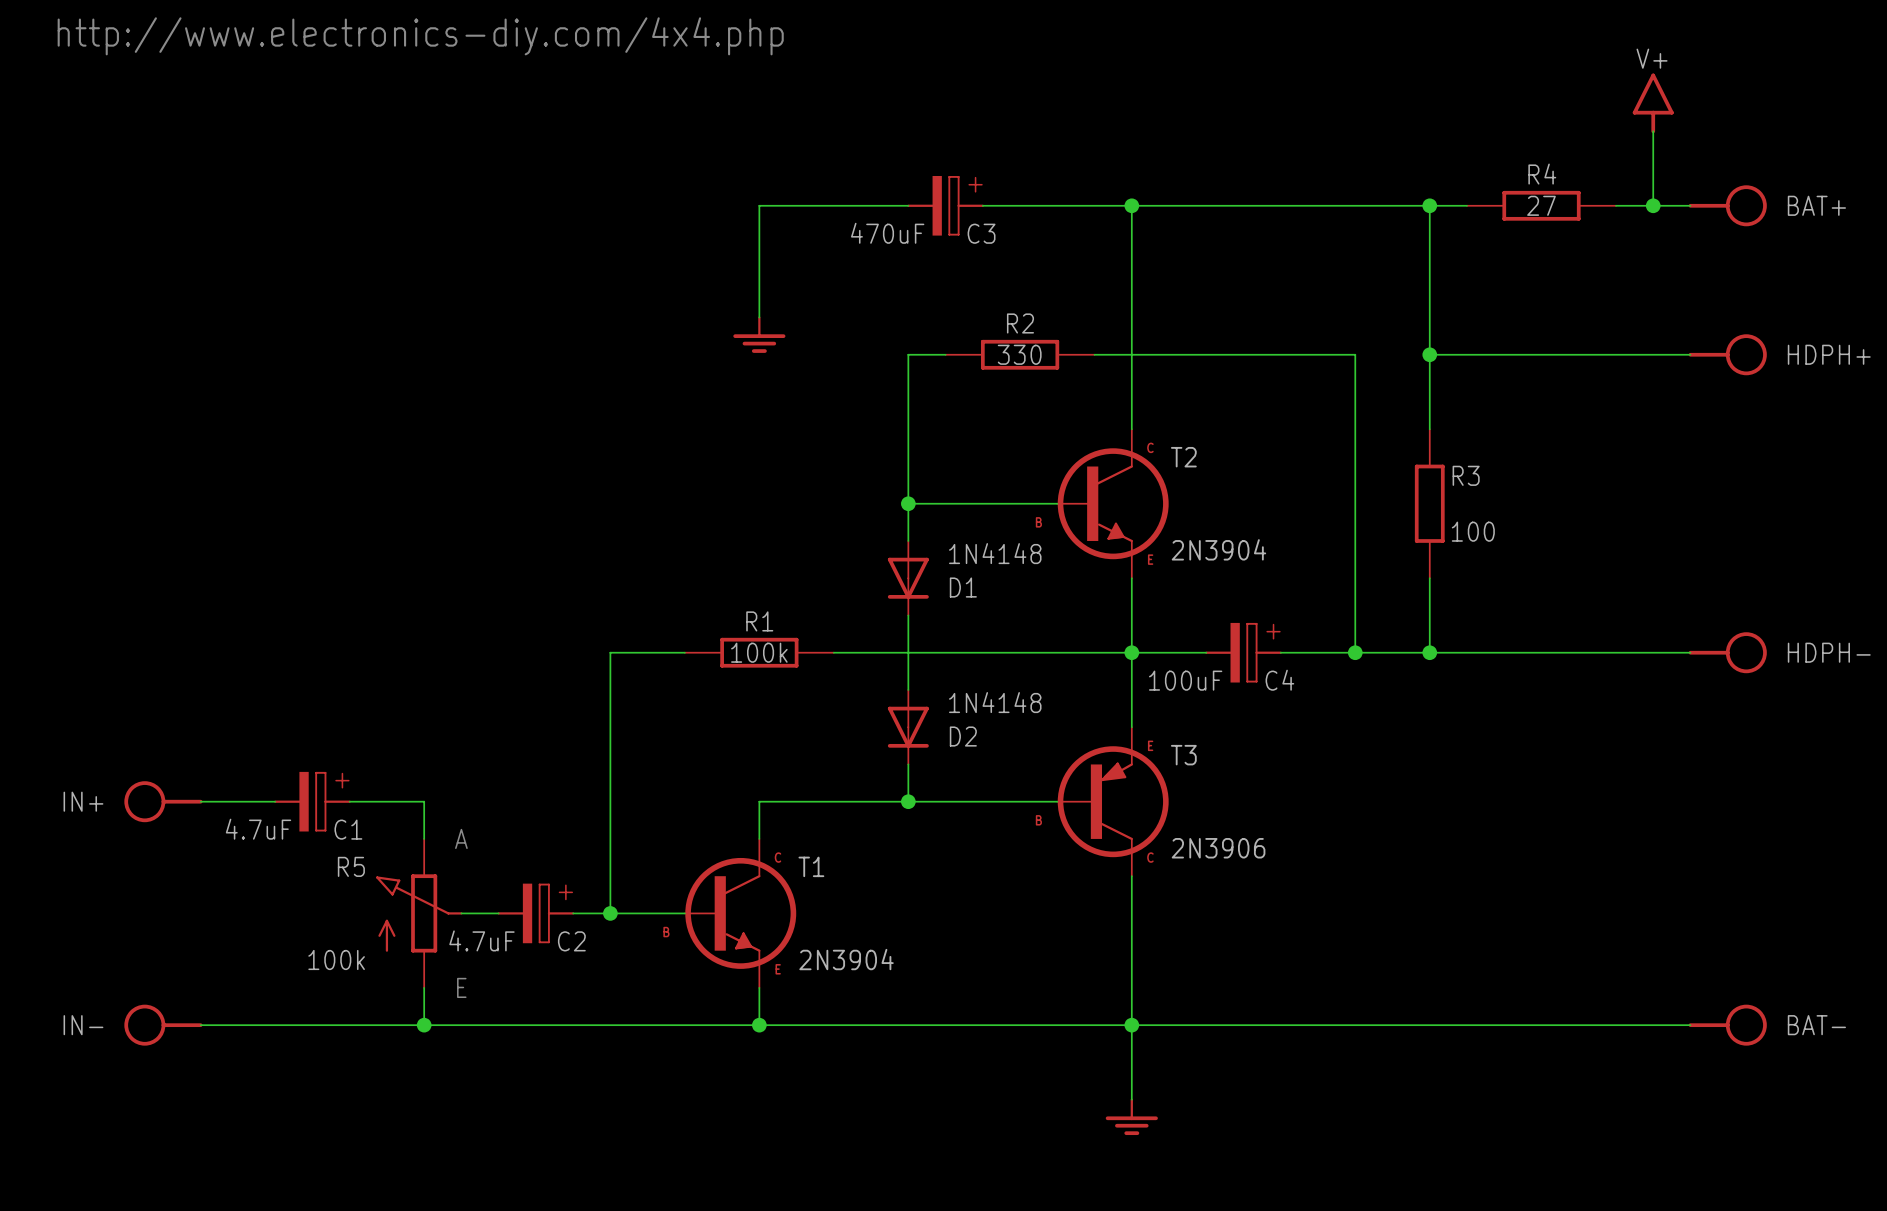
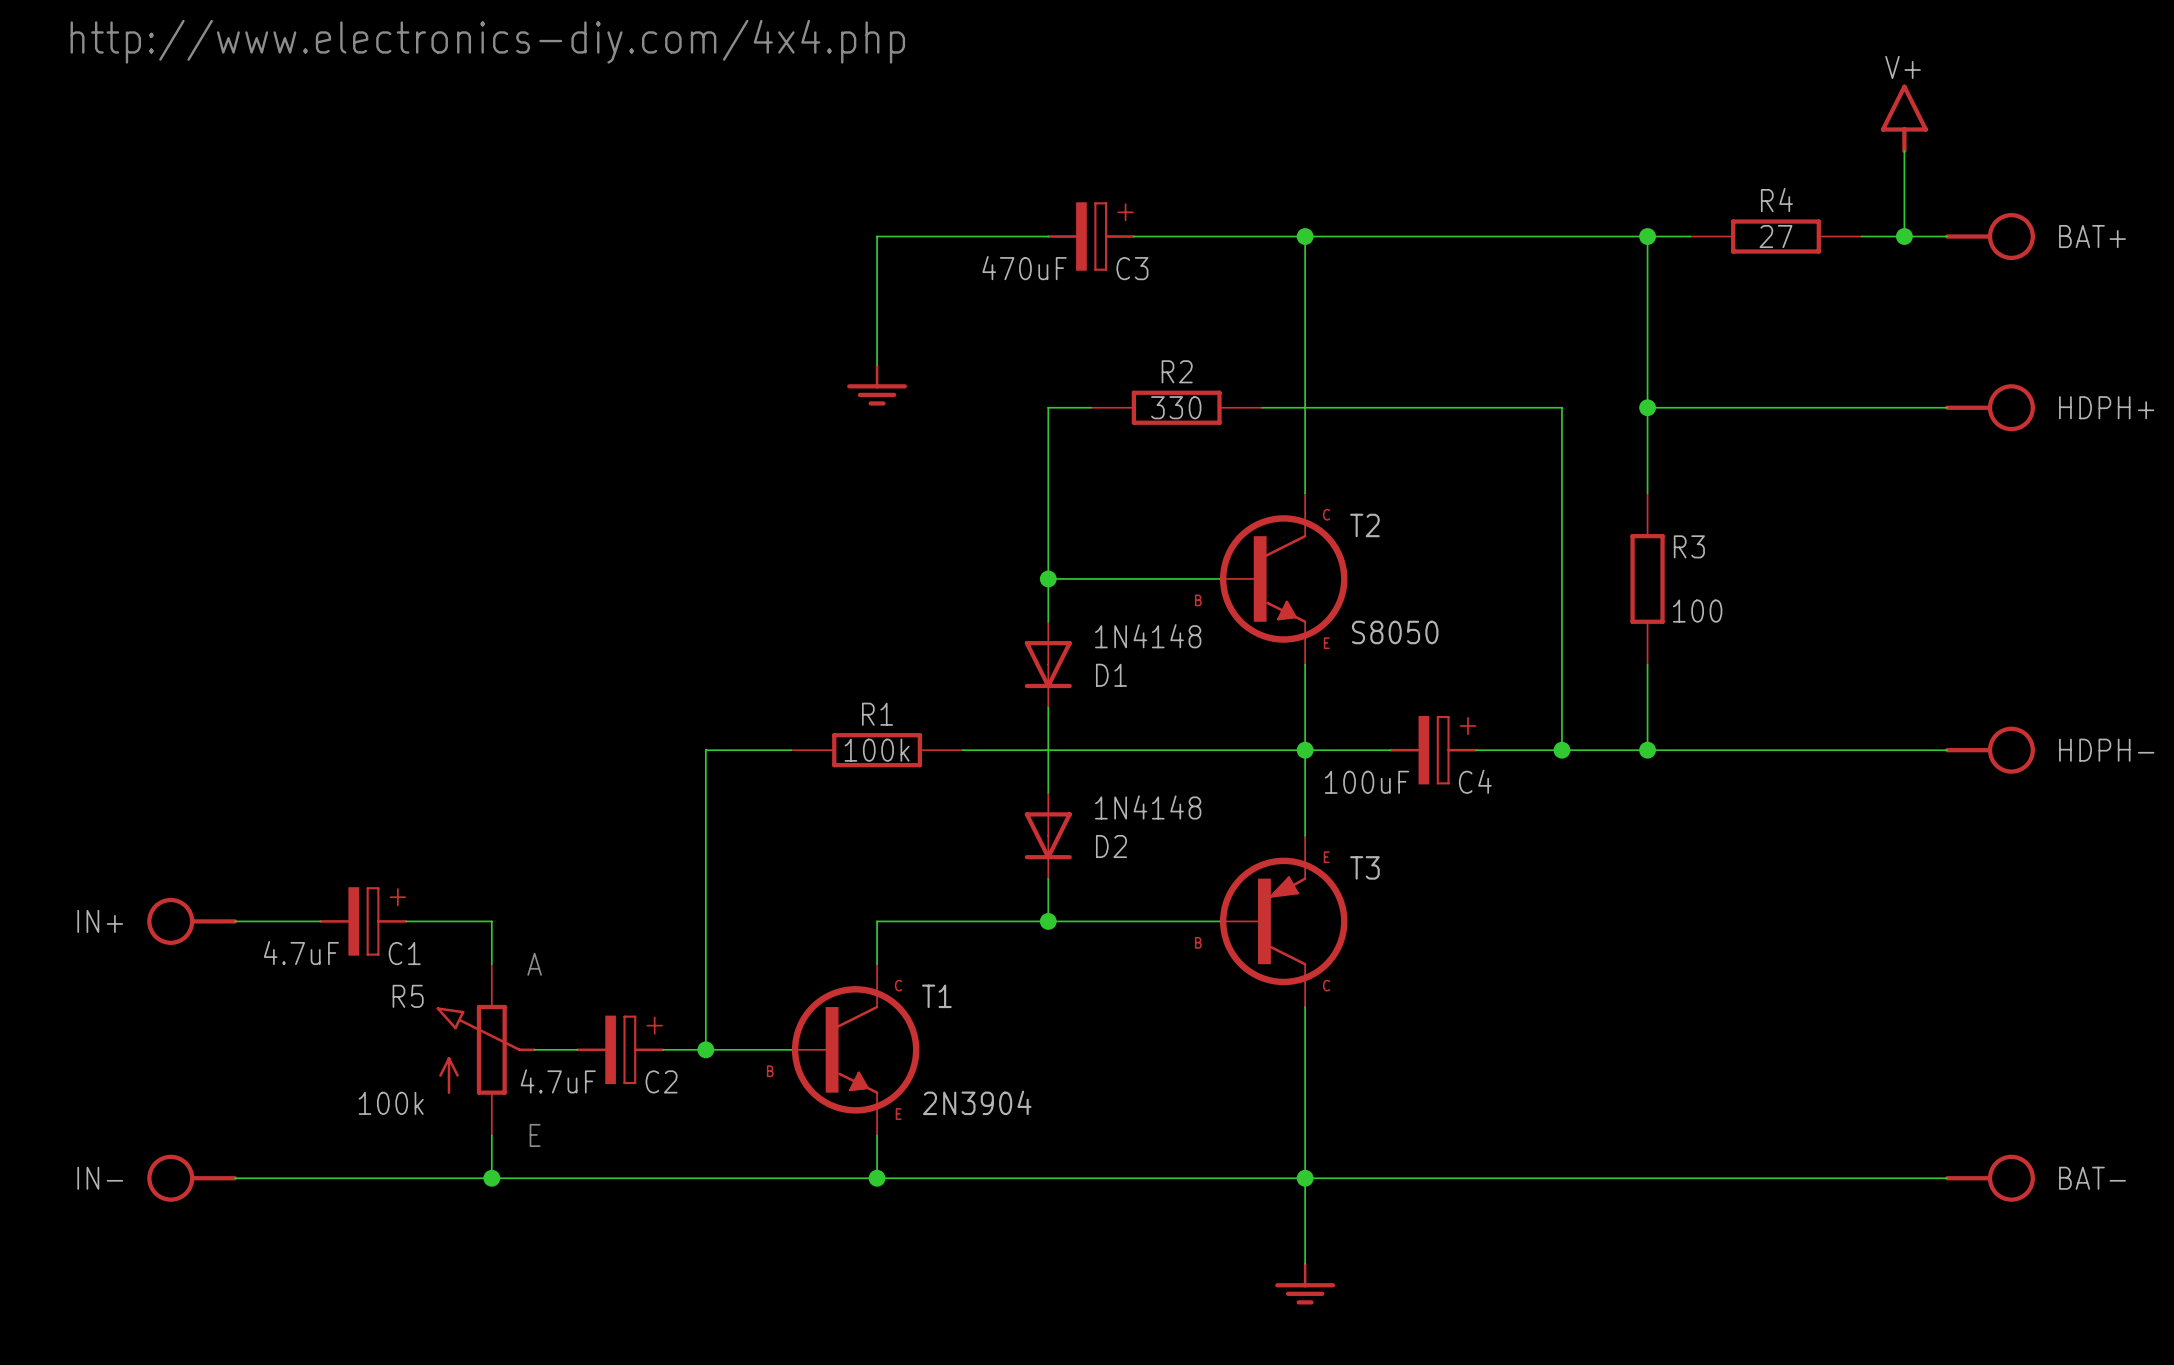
T2 value: 2N3904 (1218, 549) -> S8050 (1395, 632)
T3 value: 2N3906 (1218, 848) -> none

